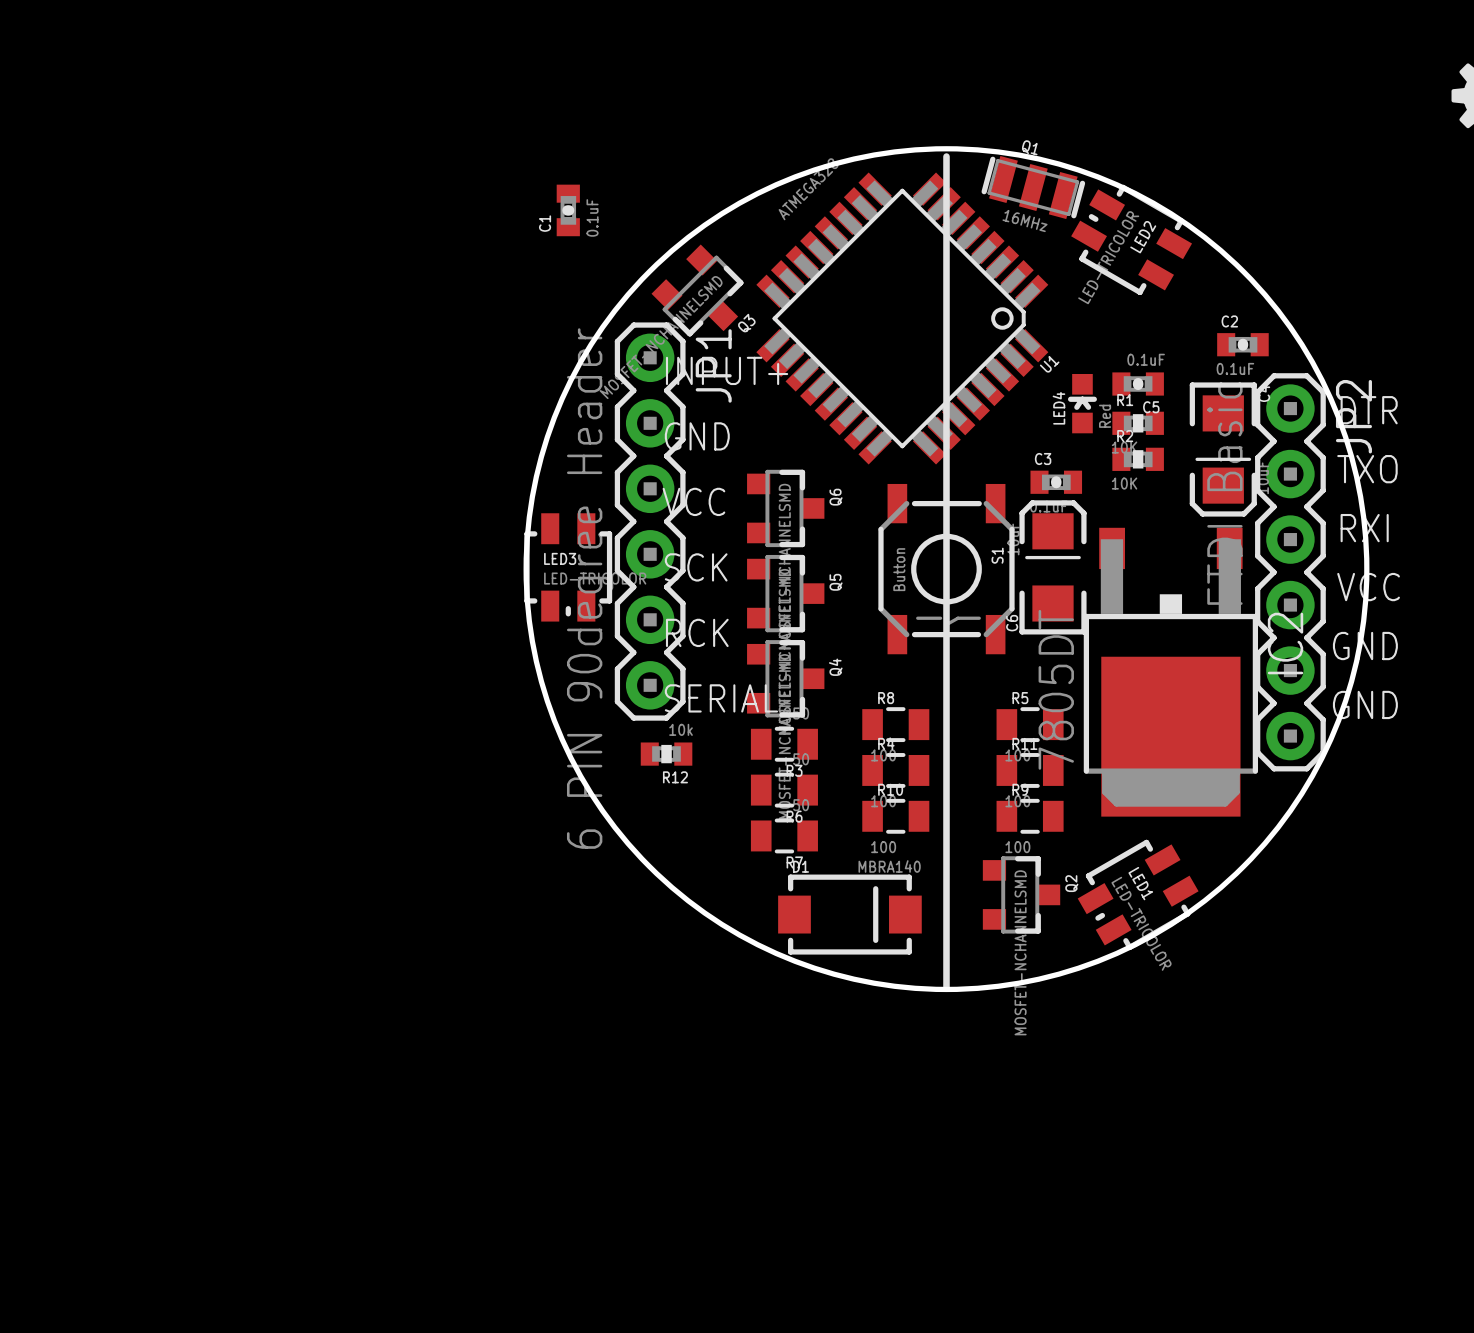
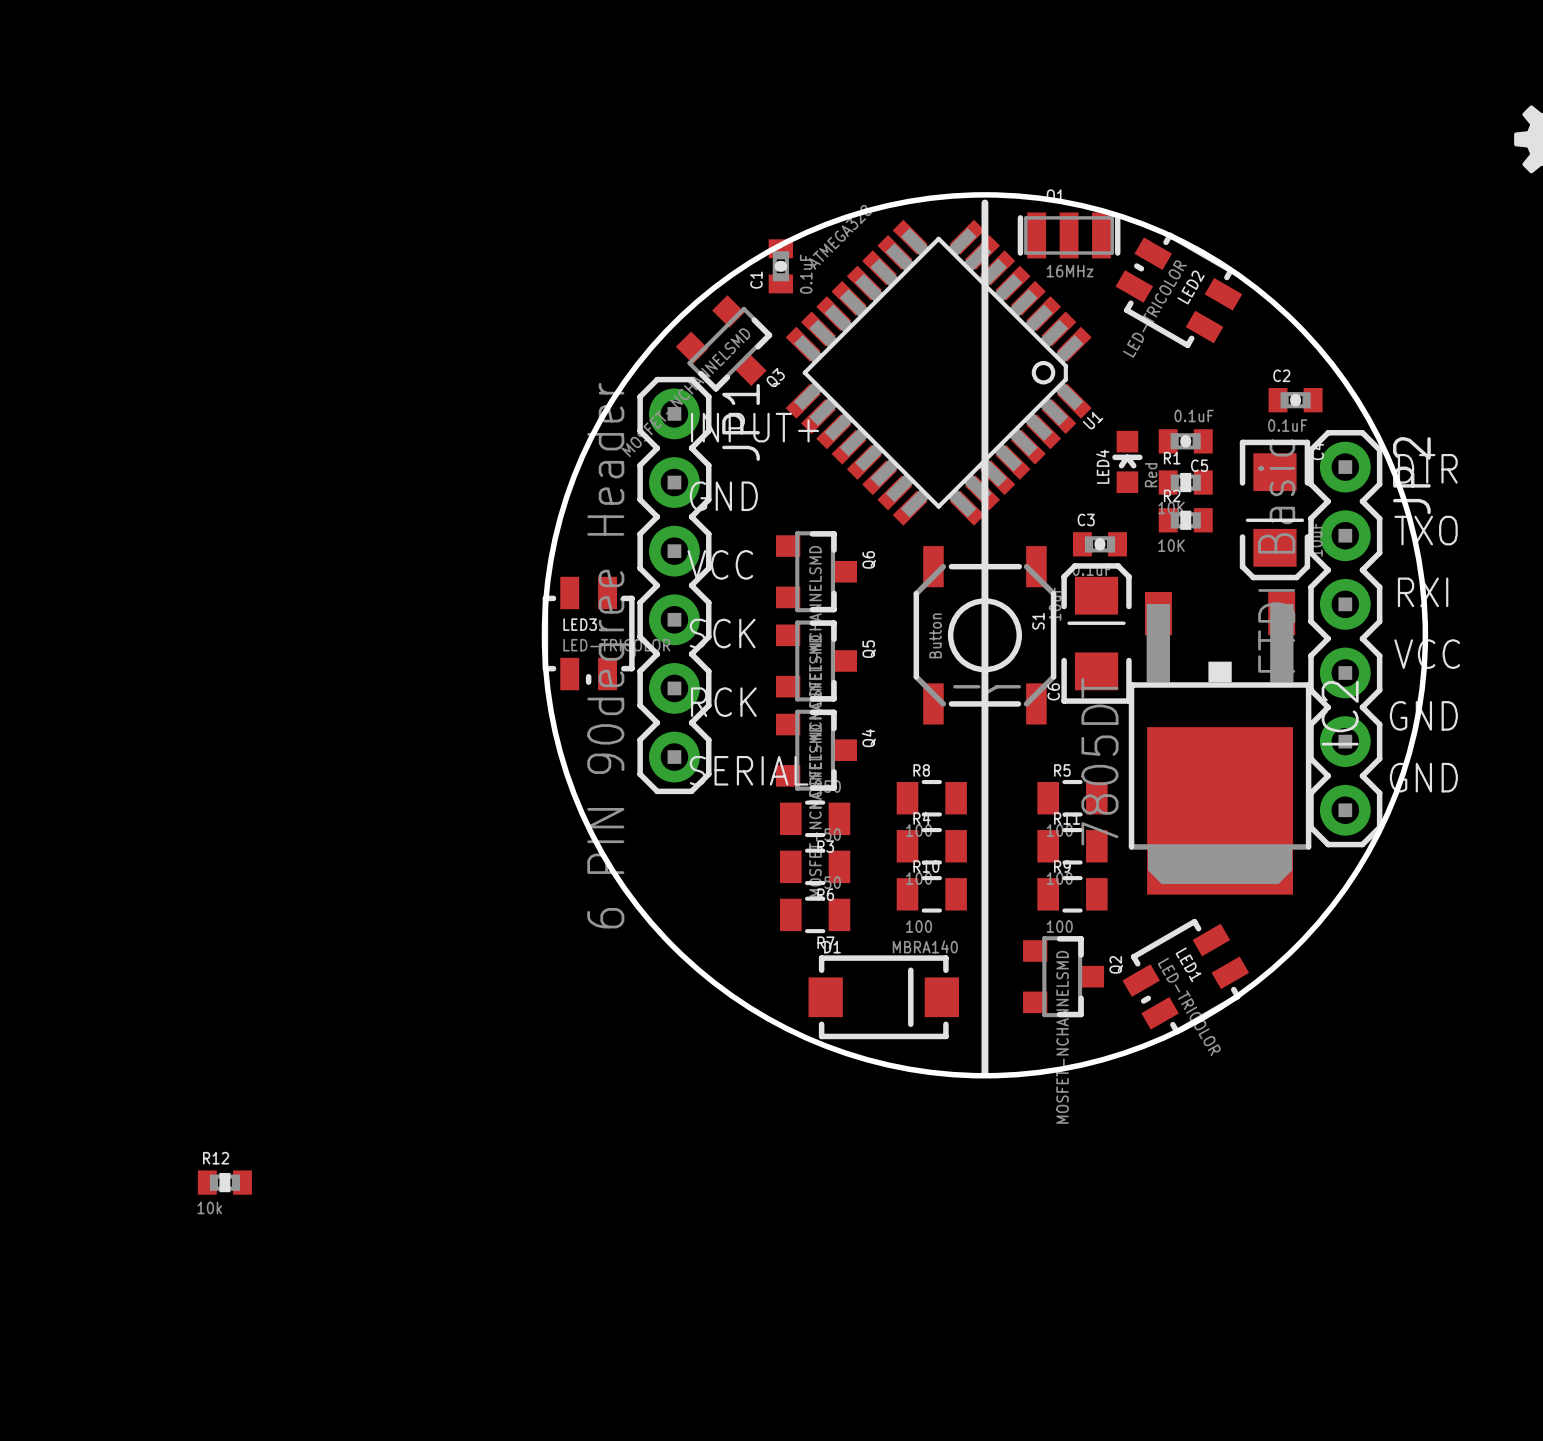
Q1 rotation: 0° (1033, 187) -> 15° counterclockwise (1069, 235)
C1 position: (568, 210) -> (780, 266)
R12 value position: 10k (681, 729) -> 10k (209, 1207)
R12 position: (666, 754) -> (224, 1182)
R12 name position: R12 (675, 777) -> R12 (216, 1158)

